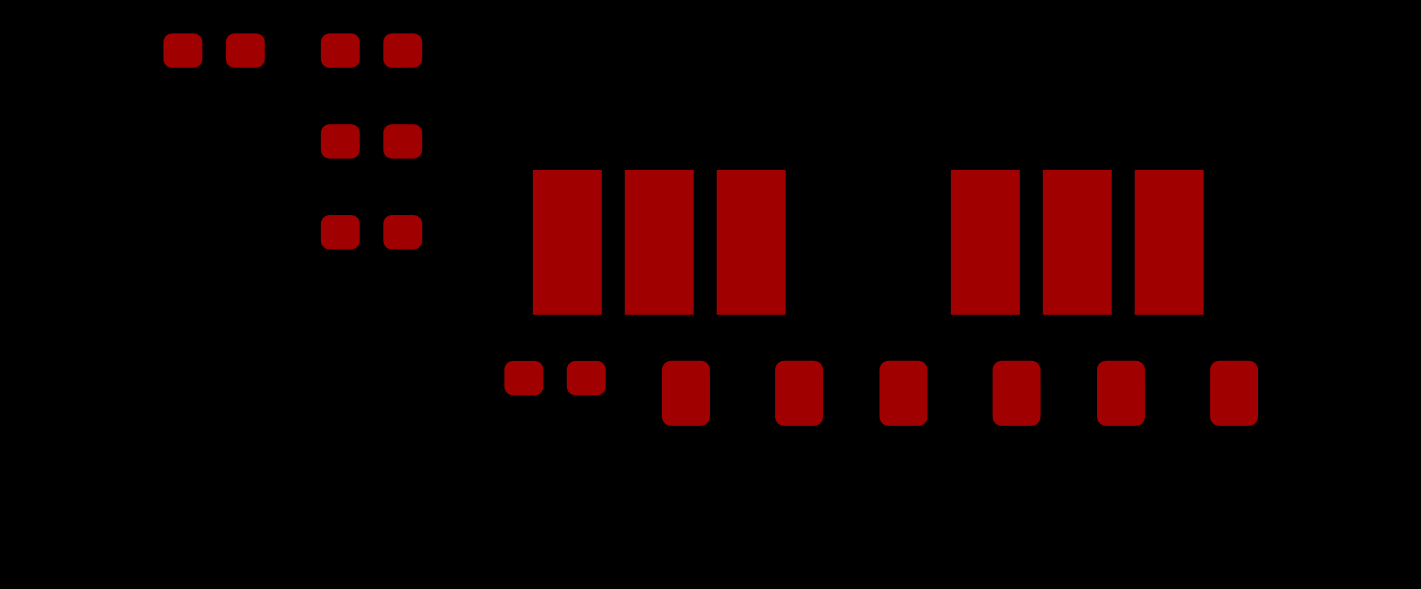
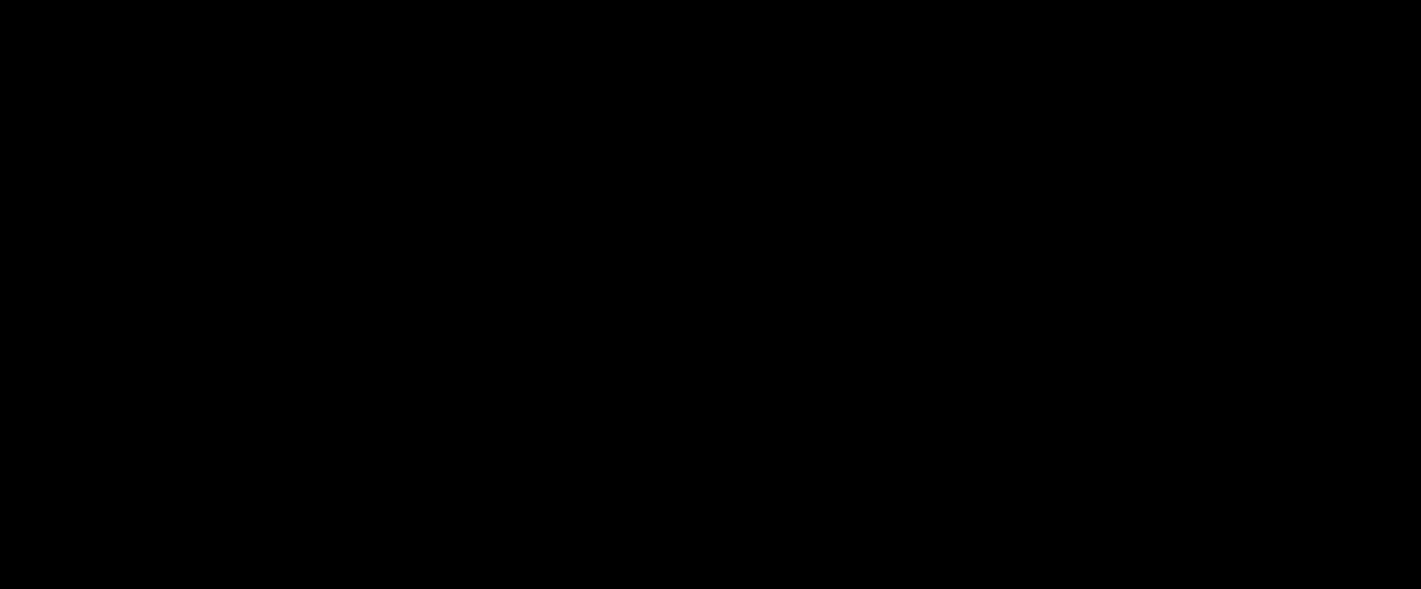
part: (214, 50) -> none
part: (371, 50) -> none
part: (371, 141) -> none
part: (371, 232) -> none
part: (659, 242) -> none
part: (1077, 242) -> none
part: (555, 378) -> none
part: (742, 393) -> none
part: (960, 393) -> none
part: (1177, 393) -> none

